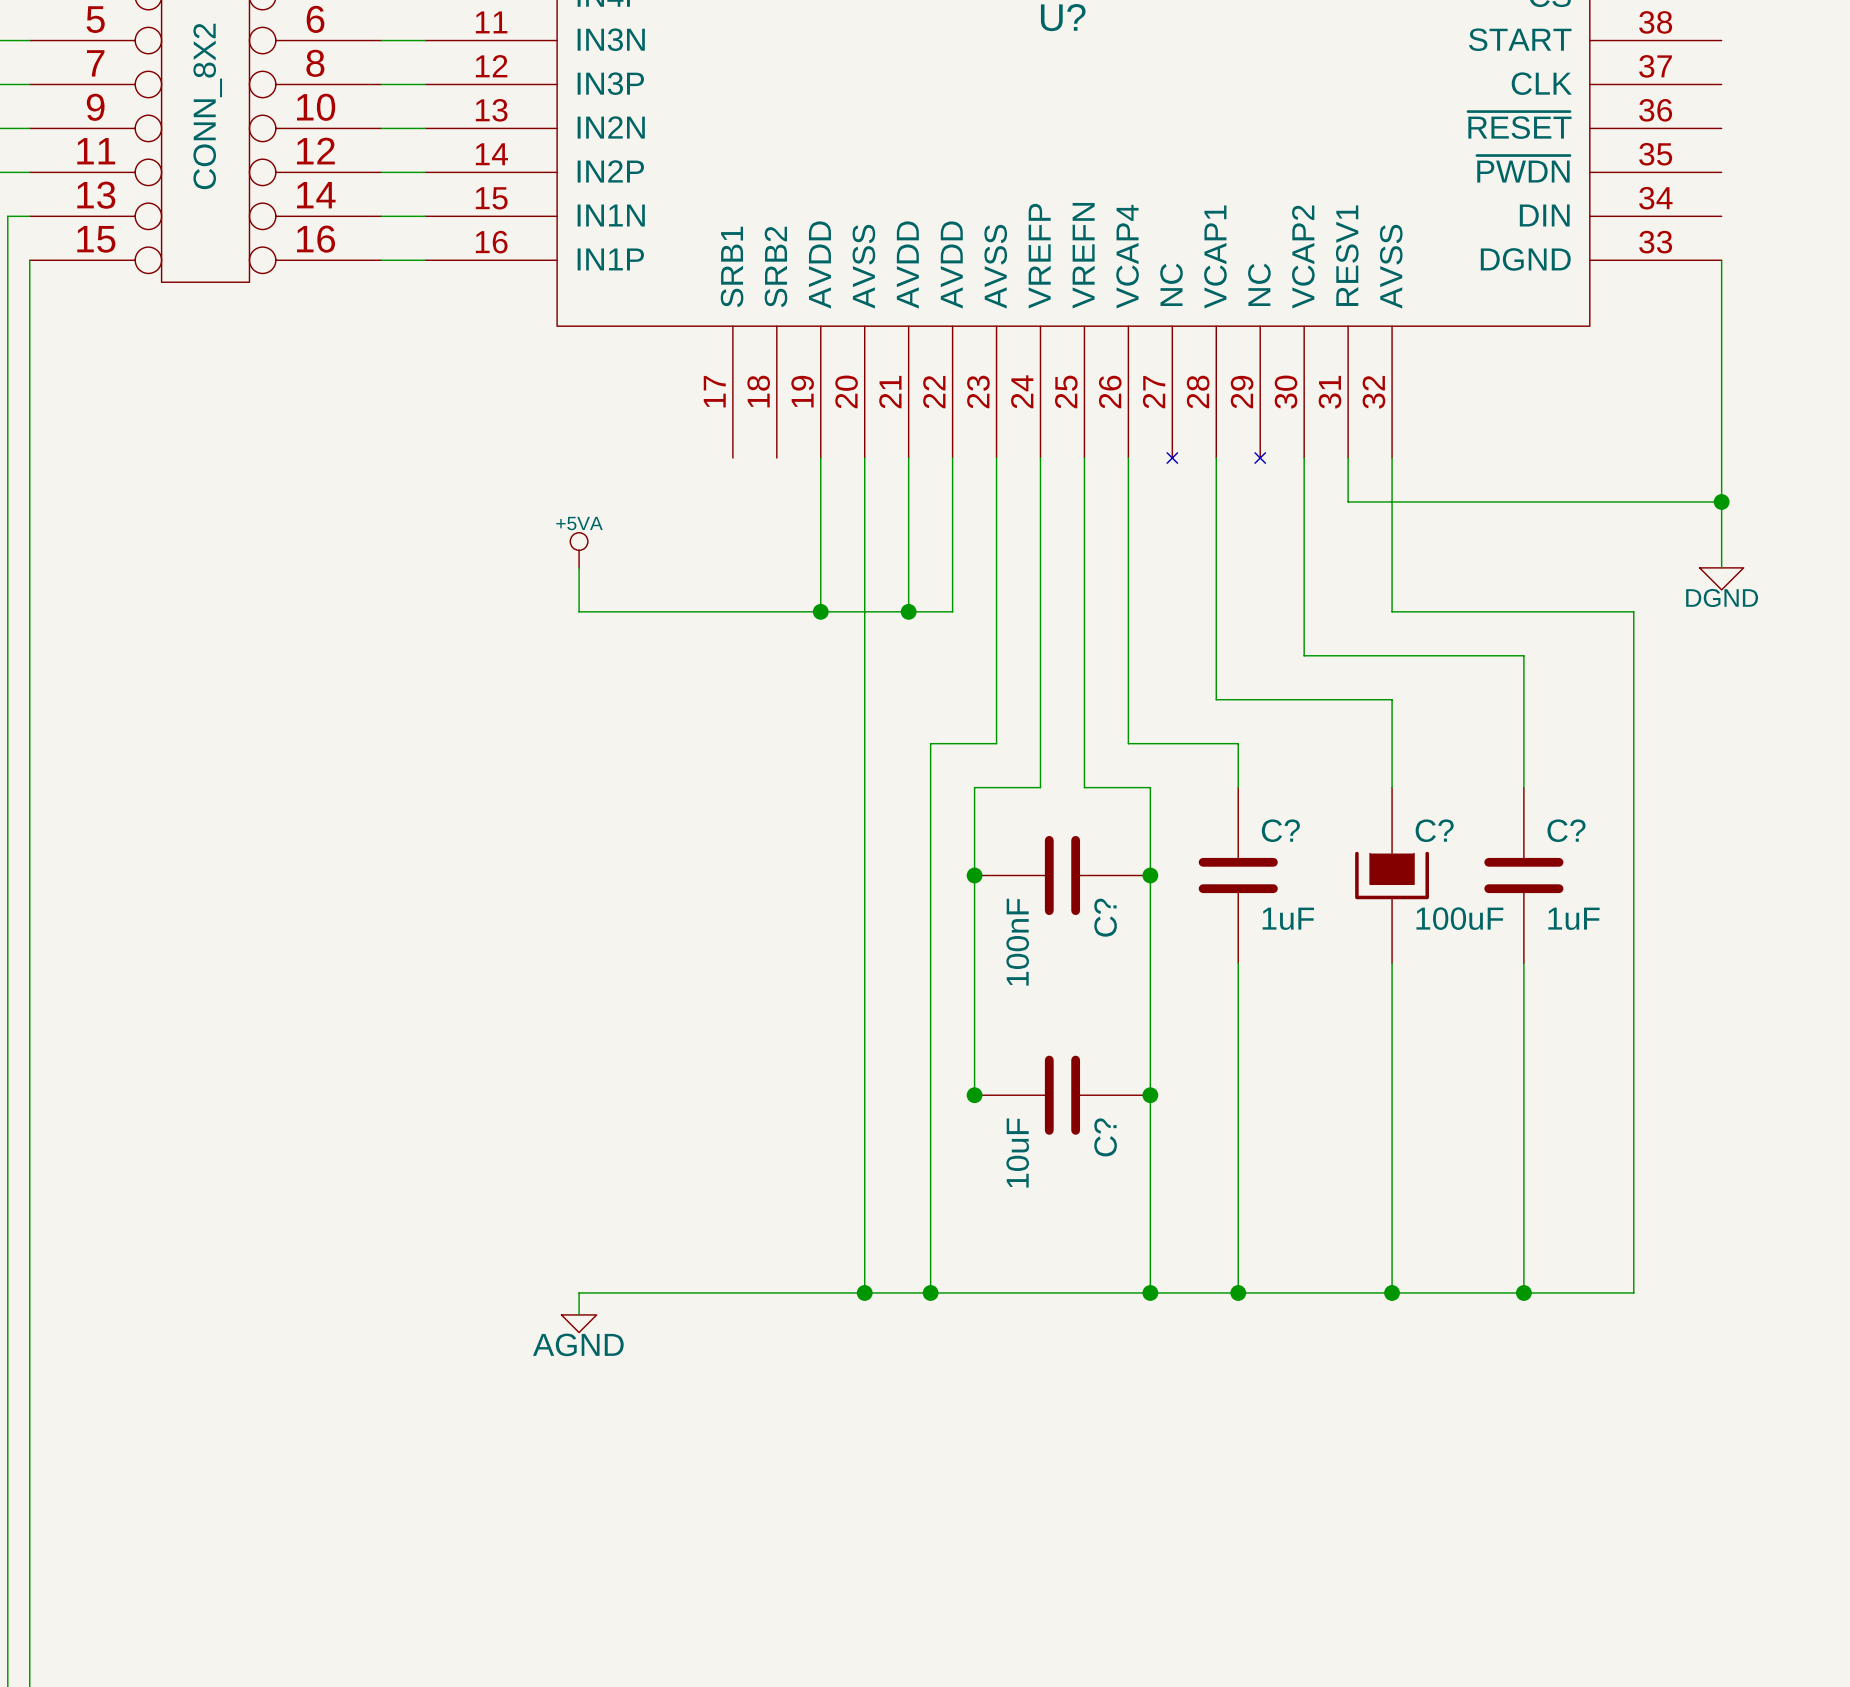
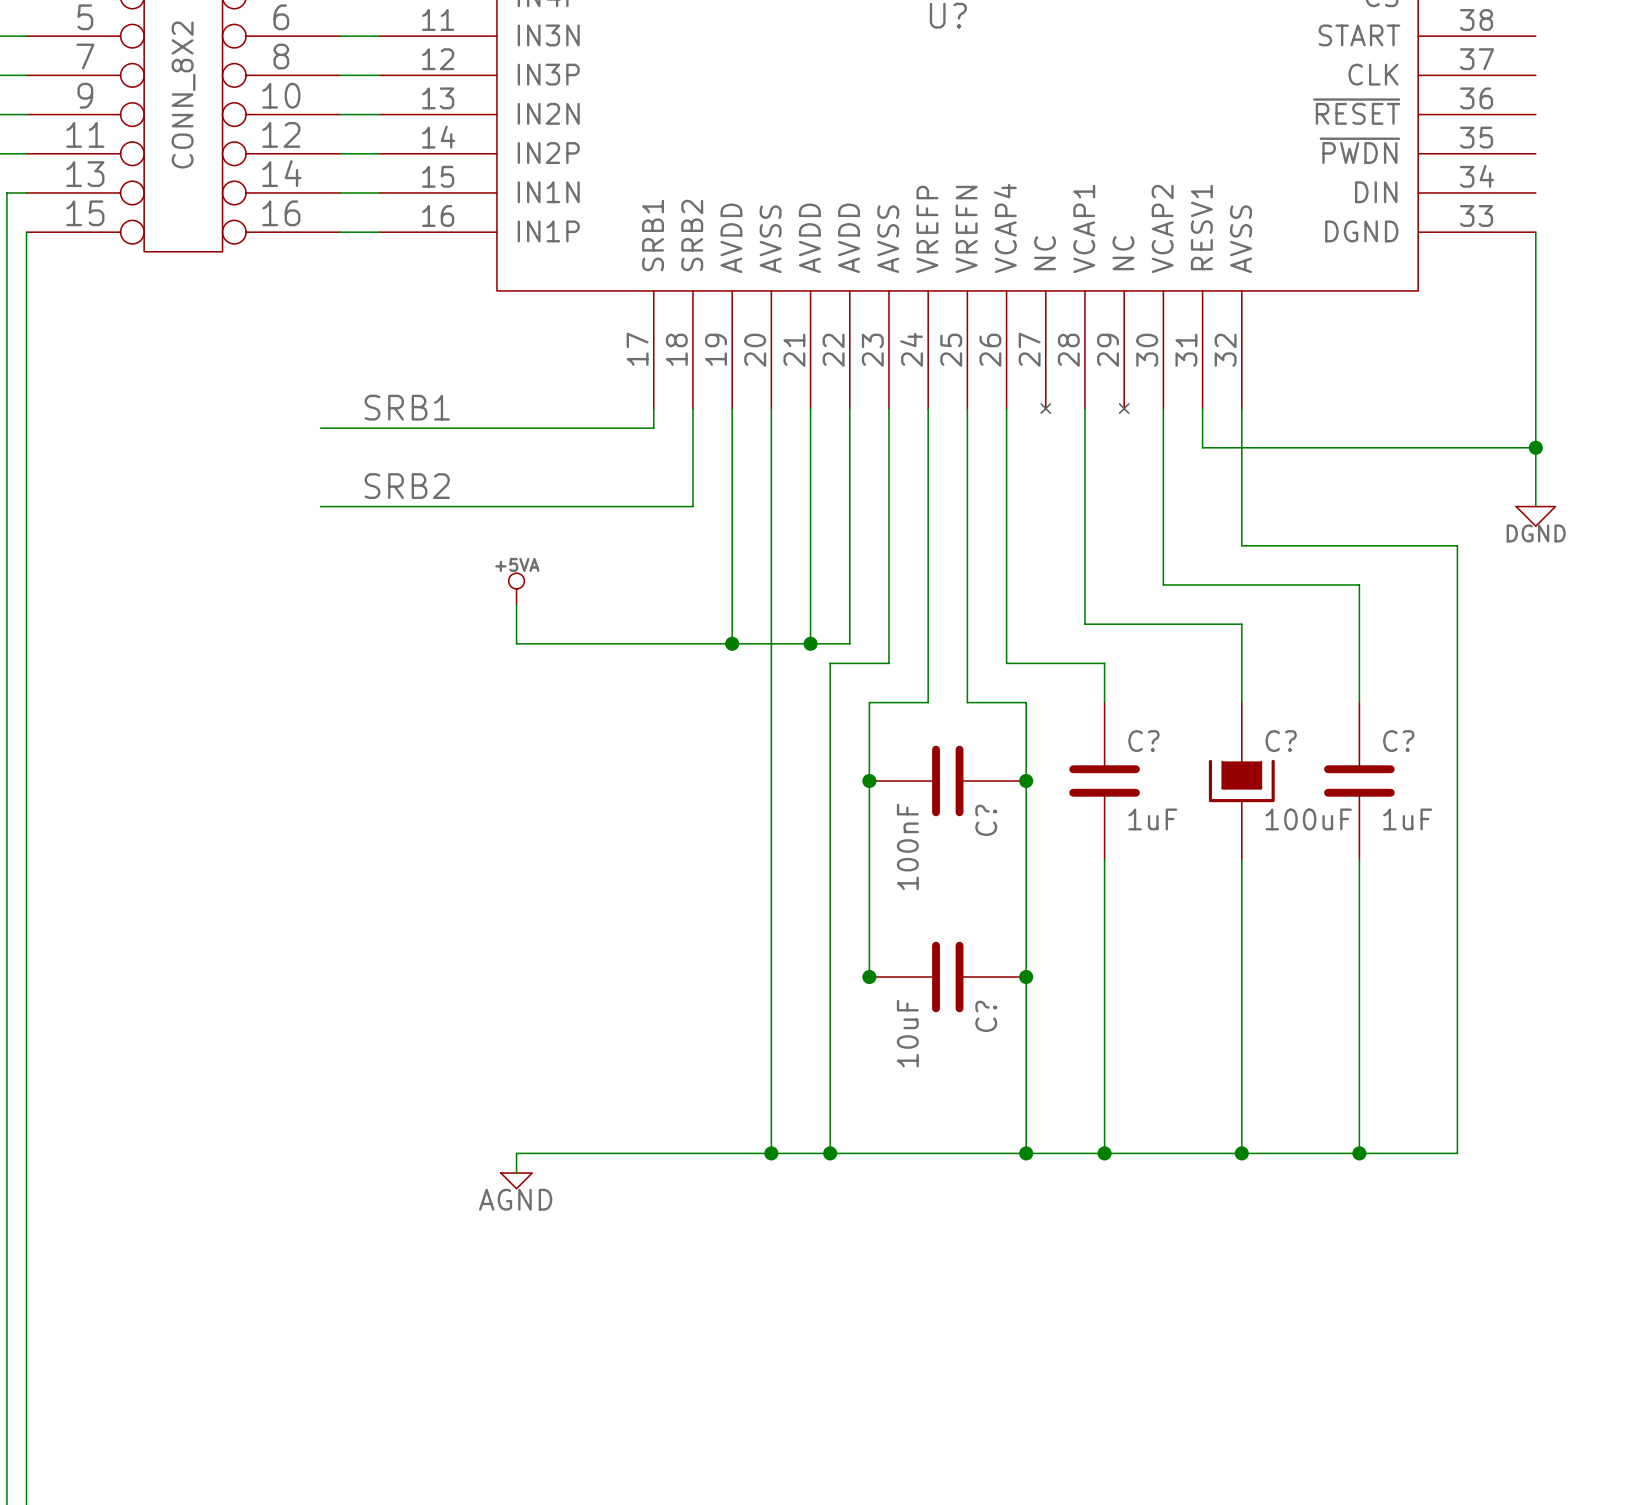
label: none -> SRB1 (407, 407)
wire: none -> (653, 408) (653, 428) (320, 428)
wire: none -> (692, 408) (692, 506) (320, 506)
label: none -> SRB2 (407, 486)
power symbol position: +5VA (579, 550) -> +5VA (516, 588)
wire: (579, 567) (579, 611) (952, 611) -> (516, 604) (516, 643) (849, 643) (849, 545)
wire: none -> (732, 545) (732, 643)
junction: (820, 611) -> none
wire: none -> (810, 545) (810, 643)
junction: (908, 611) -> none
junction: none -> (732, 643)
junction: none -> (810, 643)

